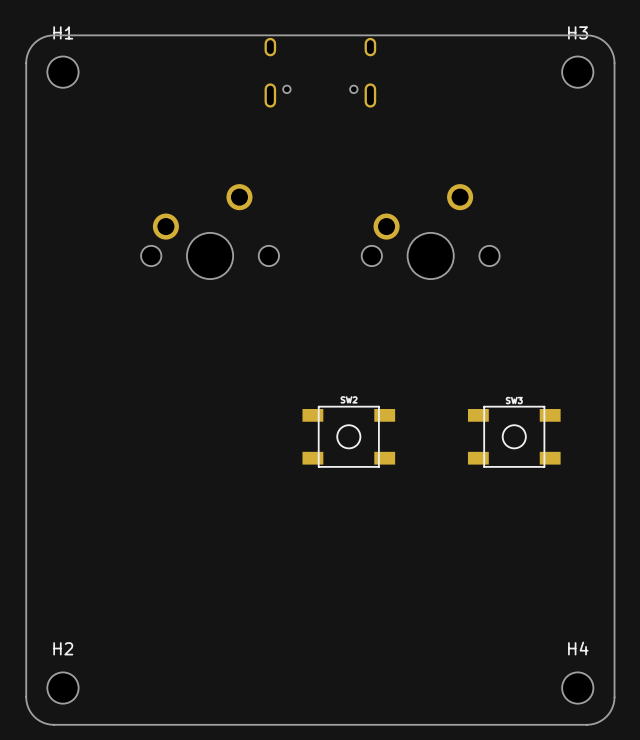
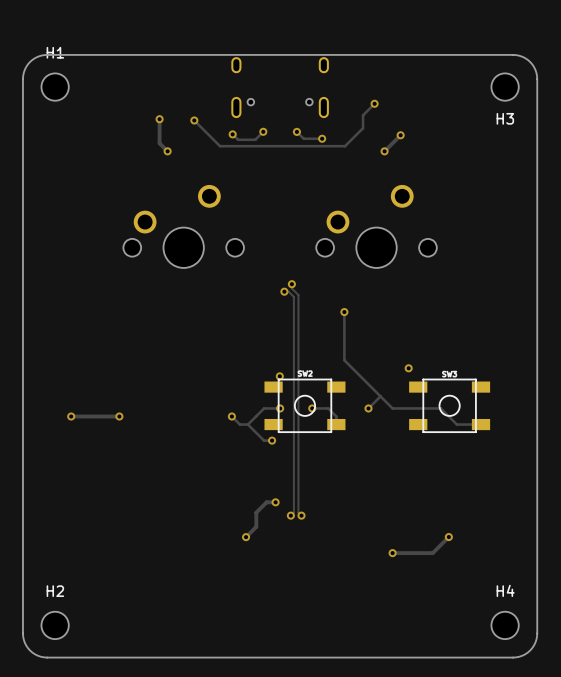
H3 name position: H3 (578, 32) -> H3 (505, 118)
track: none -> (374, 103) (363, 115) (363, 128) (345, 146) (220, 146) (194, 120)
via: none -> (374, 103)
track: none -> (159, 119) (159, 143) (167, 151)
via: none -> (159, 119)
via: none -> (194, 120)
track: none -> (263, 131) (255, 139) (238, 139) (232, 134)
via: none -> (263, 131)
track: none -> (296, 131) (303, 138) (322, 138)
via: none -> (296, 131)
via: none -> (232, 134)
track: none -> (400, 135) (384, 151)
via: none -> (400, 135)
via: none -> (322, 138)
via: none -> (167, 151)
via: none -> (384, 151)
track: none -> (291, 284) (291, 288) (298, 295) (298, 512) (301, 515)
via: none -> (291, 284)
track: none -> (284, 291) (288, 291) (293, 296) (293, 512) (290, 515)
via: none -> (284, 291)
track: none -> (344, 312) (344, 360) (392, 408) (440, 408) (456, 424) (480, 424)
via: none -> (344, 312)
via: none -> (408, 368)
via: none -> (279, 376)
track: none -> (380, 396) (368, 408)
track: none -> (280, 408) (264, 408) (247, 424)
via: none -> (280, 408)
track: none -> (312, 408) (328, 408) (336, 416) (336, 424)
via: none -> (312, 408)
via: none -> (368, 408)
track: none -> (71, 416) (119, 416)
via: none -> (71, 416)
via: none -> (119, 416)
track: none -> (231, 416) (239, 424) (247, 424)
via: none -> (231, 416)
track: none -> (247, 424) (264, 440) (272, 440)
via: none -> (272, 440)
track: none -> (275, 502) (266, 502) (256, 512) (256, 526) (246, 537)
via: none -> (275, 502)
via: none -> (290, 515)
via: none -> (301, 515)
track: none -> (448, 537) (432, 553) (392, 553)
via: none -> (448, 537)
via: none -> (246, 537)
via: none -> (392, 553)

